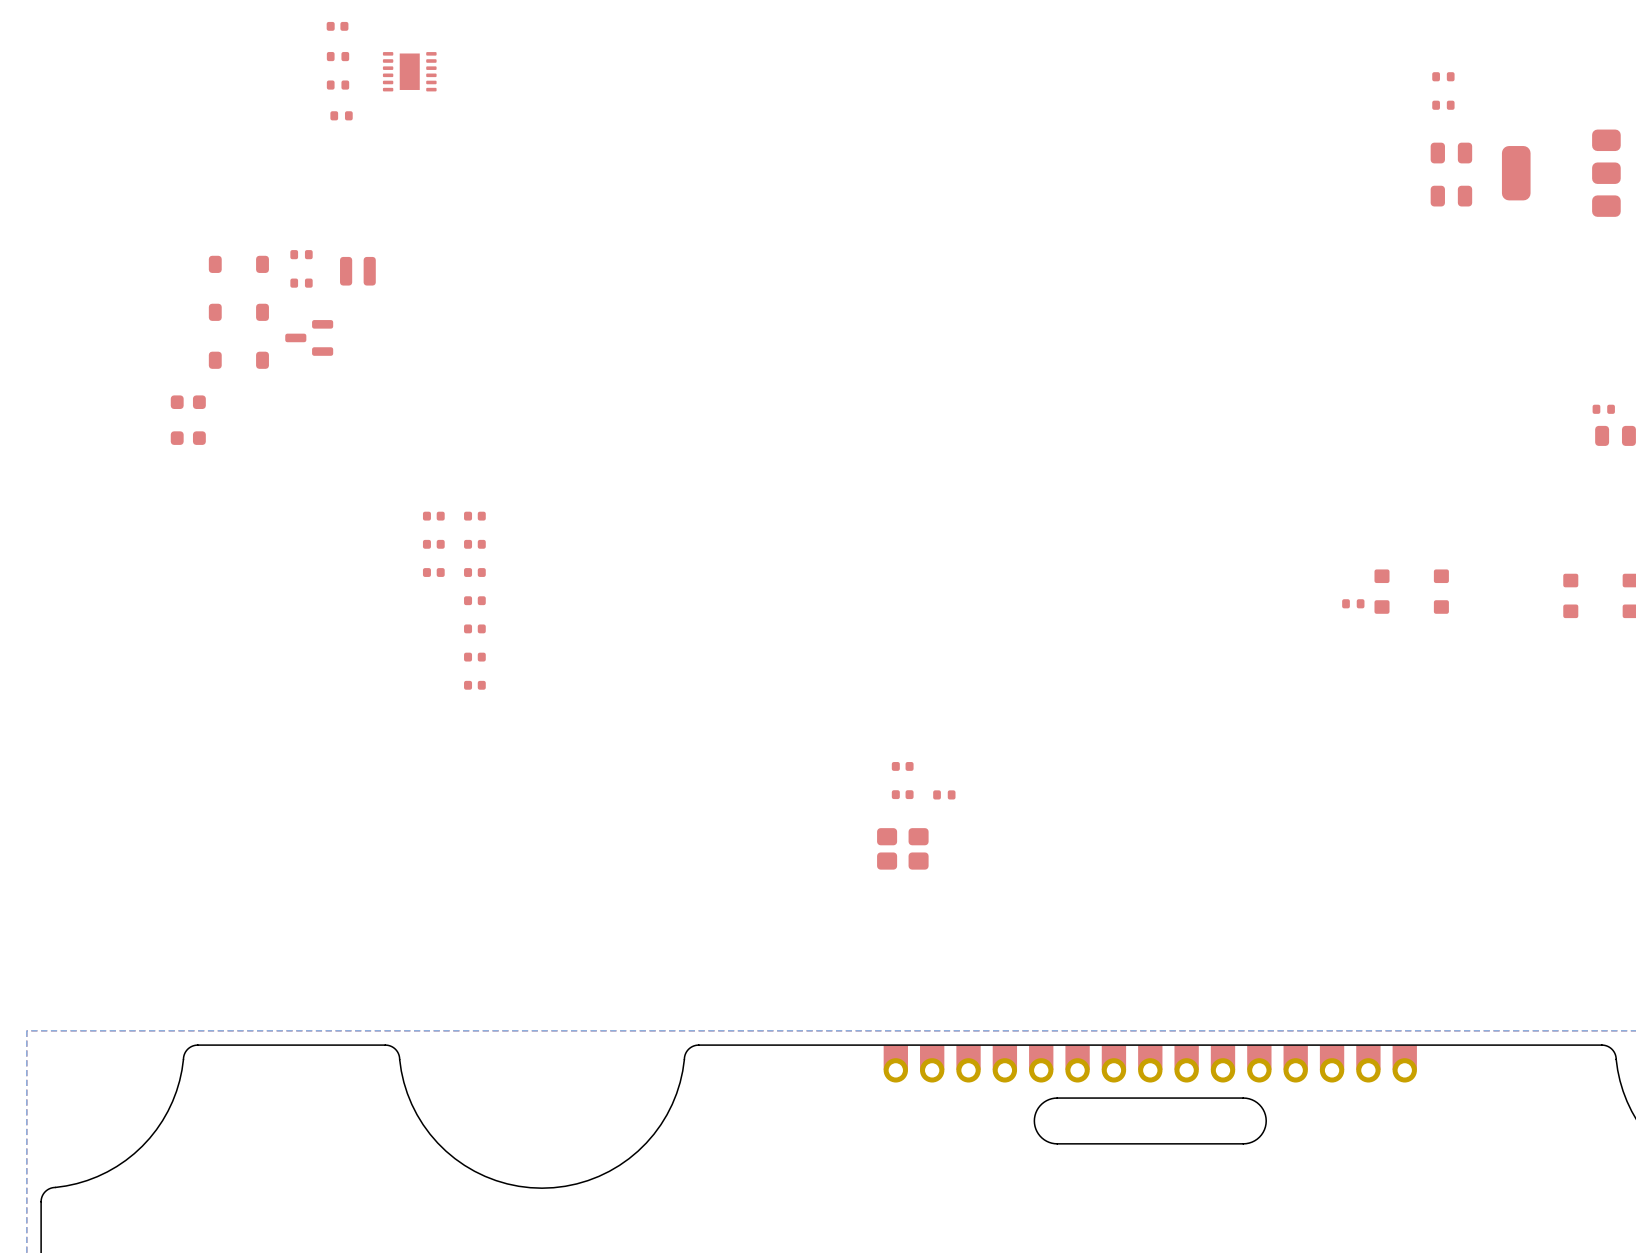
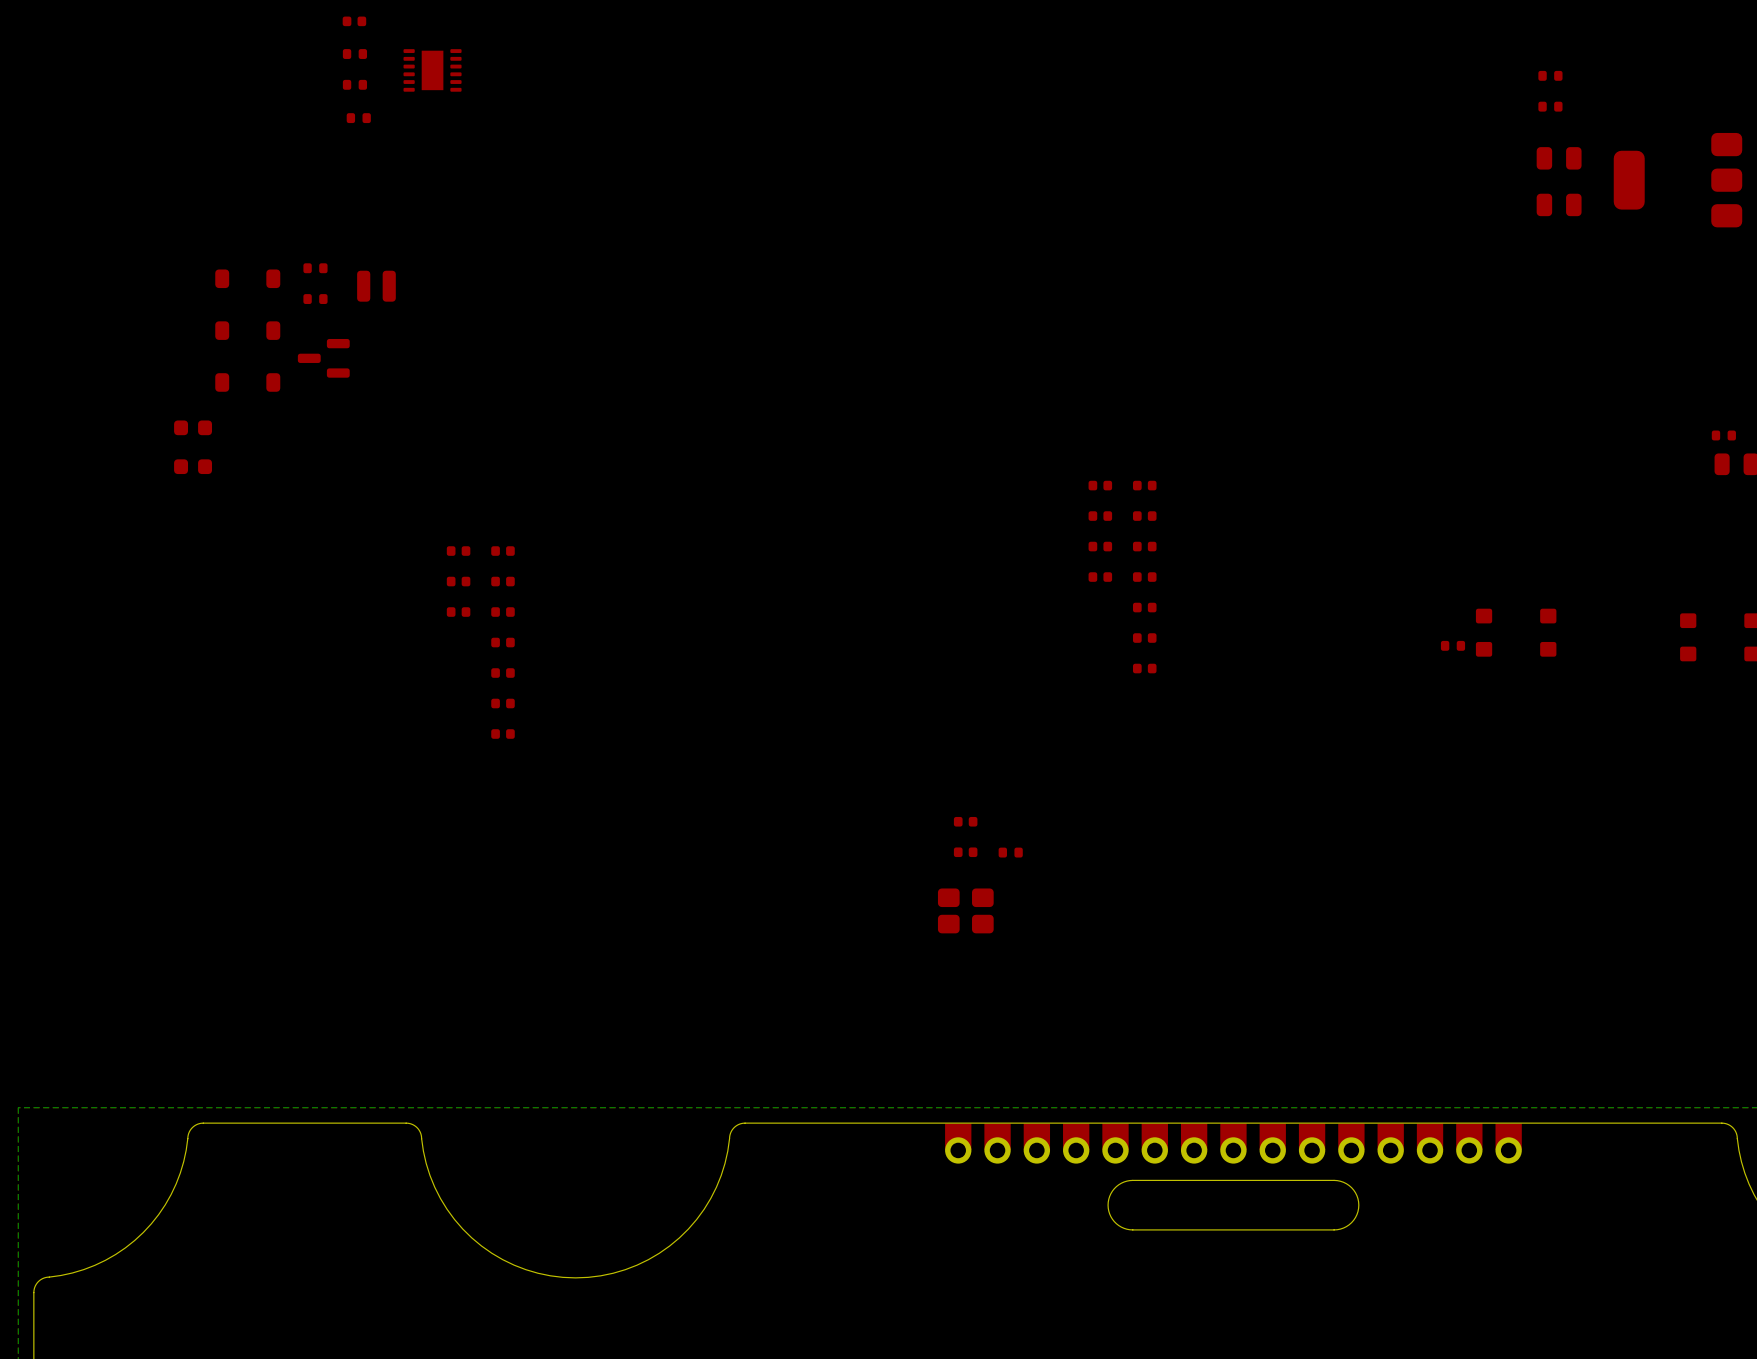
part: none -> (1100, 485)
part: none -> (1144, 485)
part: none -> (1100, 516)
part: none -> (1144, 516)
part: none -> (1100, 546)
part: none -> (1144, 546)
part: none -> (1100, 577)
part: none -> (1144, 577)
part: none -> (1144, 607)
part: none -> (1144, 638)
part: none -> (1144, 668)

